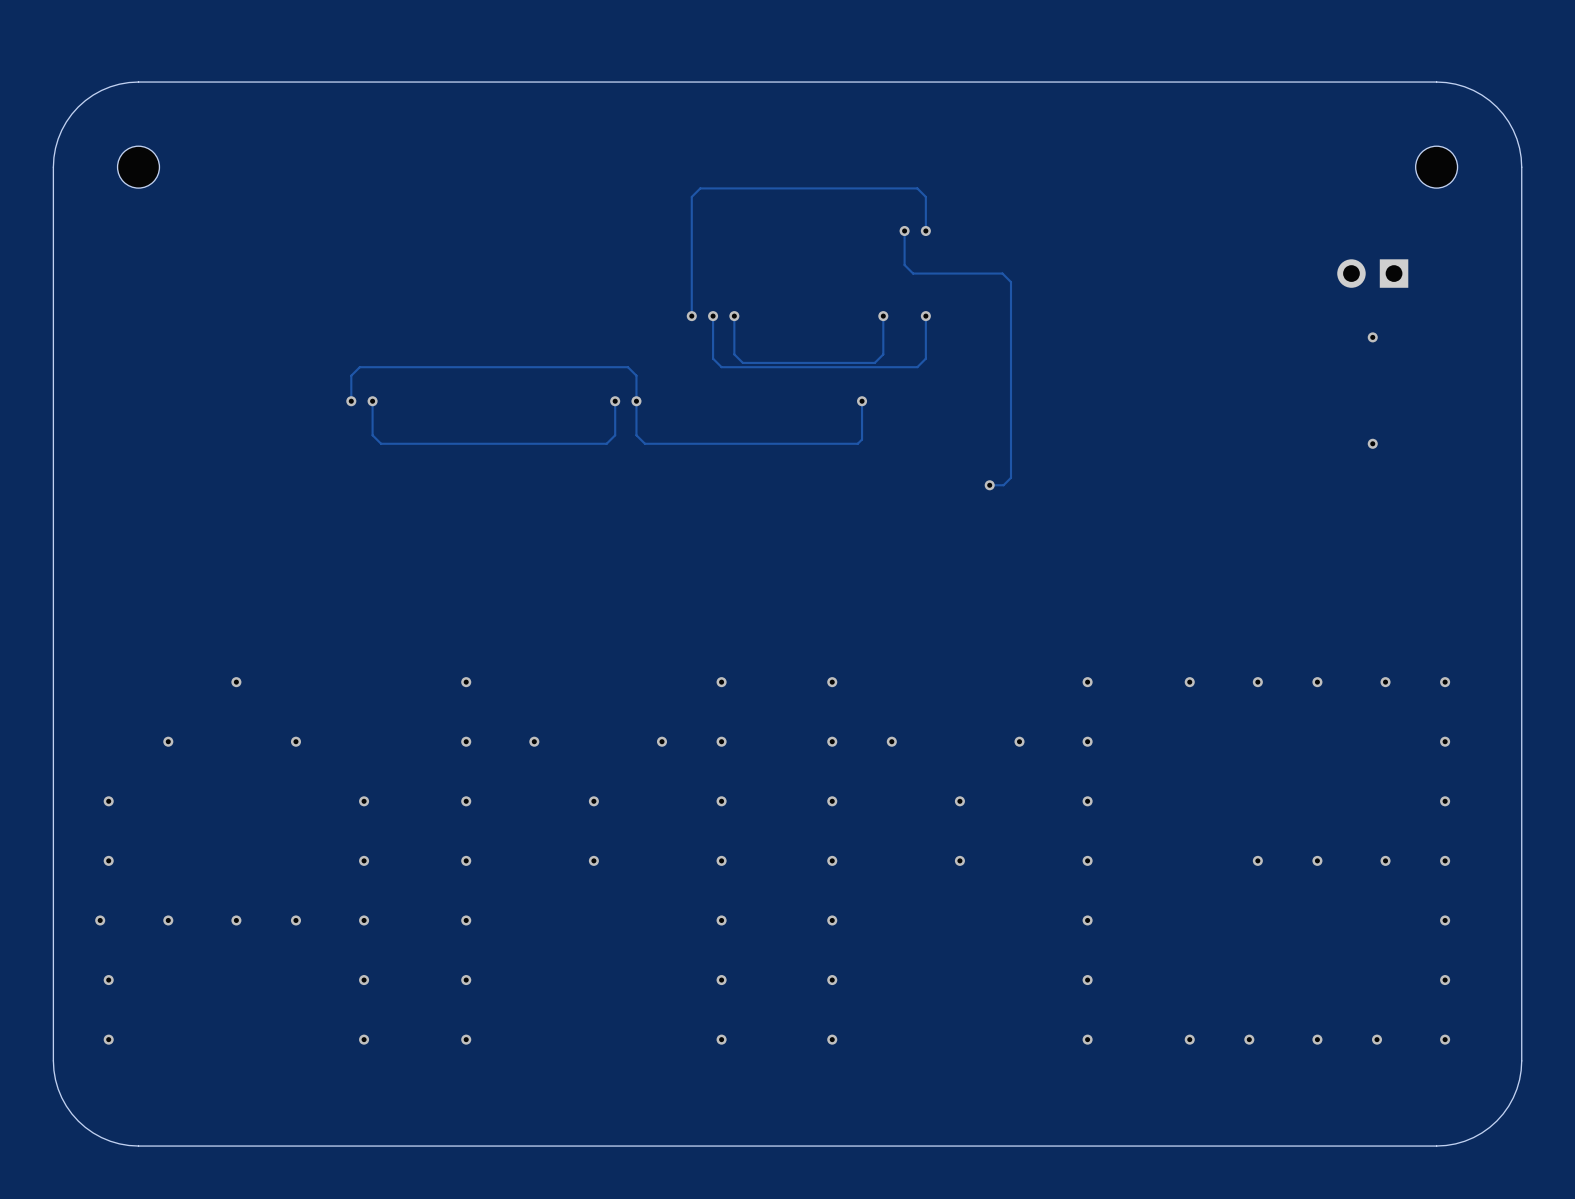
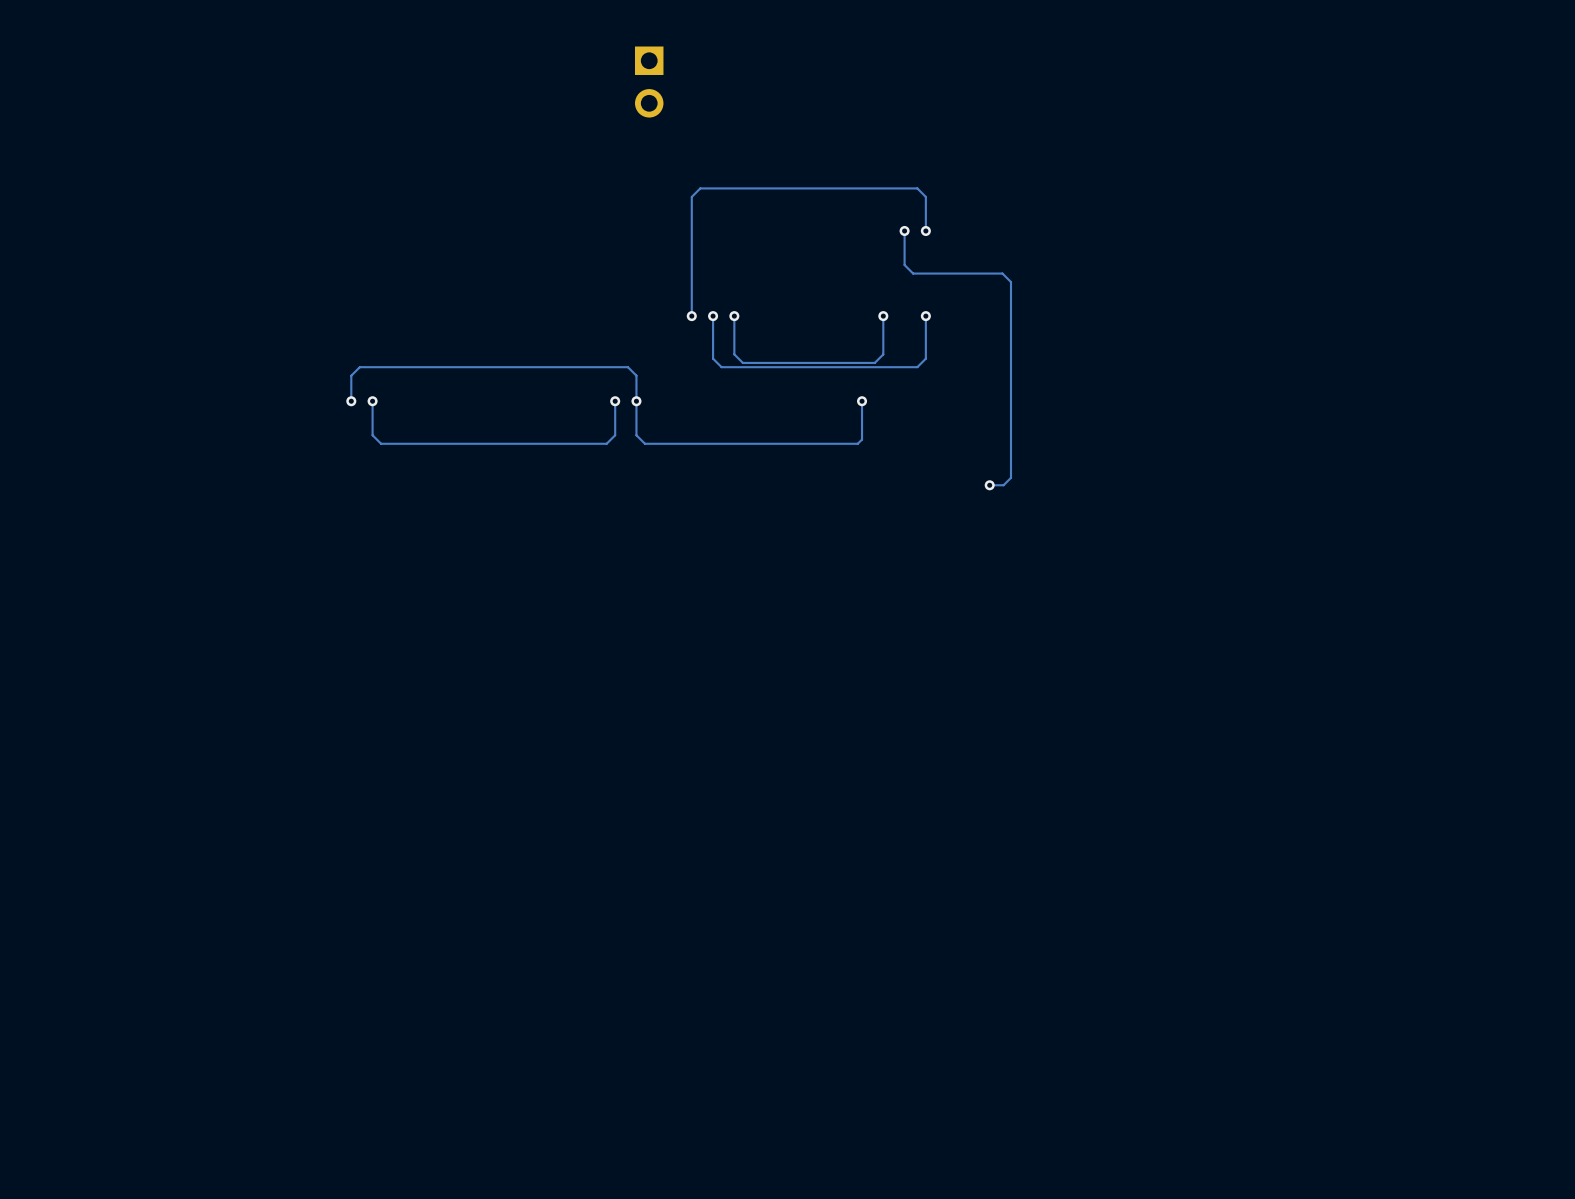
part: none -> (649, 82)
board edge: (1436, 82) (138, 82) (110, 86) (85, 100) (71, 114) (61, 130) (55, 148) (53, 167) (53, 1060) (58, 1089) (71, 1113) (85, 1127) (101, 1137) (119, 1143) (138, 1146) (1436, 1146) (1464, 1141) (1489, 1127) (1503, 1113) (1513, 1097) (1519, 1079) (1521, 1060) (1521, 167) (1519, 148) (1513, 130) (1496, 106) (1473, 90) (1455, 84) (1436, 82) -> none
part: (138, 167) -> none
part: (1436, 167) -> none
part: (1372, 273) -> none
via: (1372, 337) -> none
via: (1372, 443) -> none
via: (236, 682) -> none
via: (466, 682) -> none
via: (721, 682) -> none
via: (832, 682) -> none
via: (1087, 682) -> none
via: (1189, 682) -> none
via: (1257, 682) -> none
via: (1317, 682) -> none
via: (1385, 682) -> none
via: (1445, 682) -> none
via: (168, 741) -> none
via: (295, 741) -> none
via: (466, 741) -> none
via: (534, 741) -> none
via: (662, 741) -> none
via: (721, 741) -> none
via: (832, 741) -> none
via: (891, 741) -> none
via: (1019, 741) -> none
via: (1087, 741) -> none
via: (1445, 741) -> none
via: (108, 801) -> none
via: (364, 801) -> none
via: (466, 801) -> none
via: (593, 801) -> none
via: (721, 801) -> none
via: (832, 801) -> none
via: (959, 801) -> none
via: (1087, 801) -> none
via: (1445, 801) -> none
via: (108, 860) -> none
via: (364, 860) -> none
via: (466, 860) -> none
via: (593, 860) -> none
via: (721, 860) -> none
via: (832, 860) -> none
via: (959, 860) -> none
via: (1087, 860) -> none
via: (1257, 860) -> none
via: (1317, 860) -> none
via: (1385, 860) -> none
via: (1445, 860) -> none
via: (100, 920) -> none
via: (168, 920) -> none
via: (236, 920) -> none
via: (295, 920) -> none
via: (364, 920) -> none
via: (466, 920) -> none
via: (721, 920) -> none
via: (832, 920) -> none
via: (1087, 920) -> none
via: (1445, 920) -> none
via: (108, 980) -> none
via: (364, 980) -> none
via: (466, 980) -> none
via: (721, 980) -> none
via: (832, 980) -> none
via: (1087, 980) -> none
via: (1445, 980) -> none
via: (108, 1039) -> none
via: (364, 1039) -> none
via: (466, 1039) -> none
via: (721, 1039) -> none
via: (832, 1039) -> none
via: (1087, 1039) -> none
via: (1189, 1039) -> none
via: (1249, 1039) -> none
via: (1317, 1039) -> none
via: (1377, 1039) -> none
via: (1445, 1039) -> none

